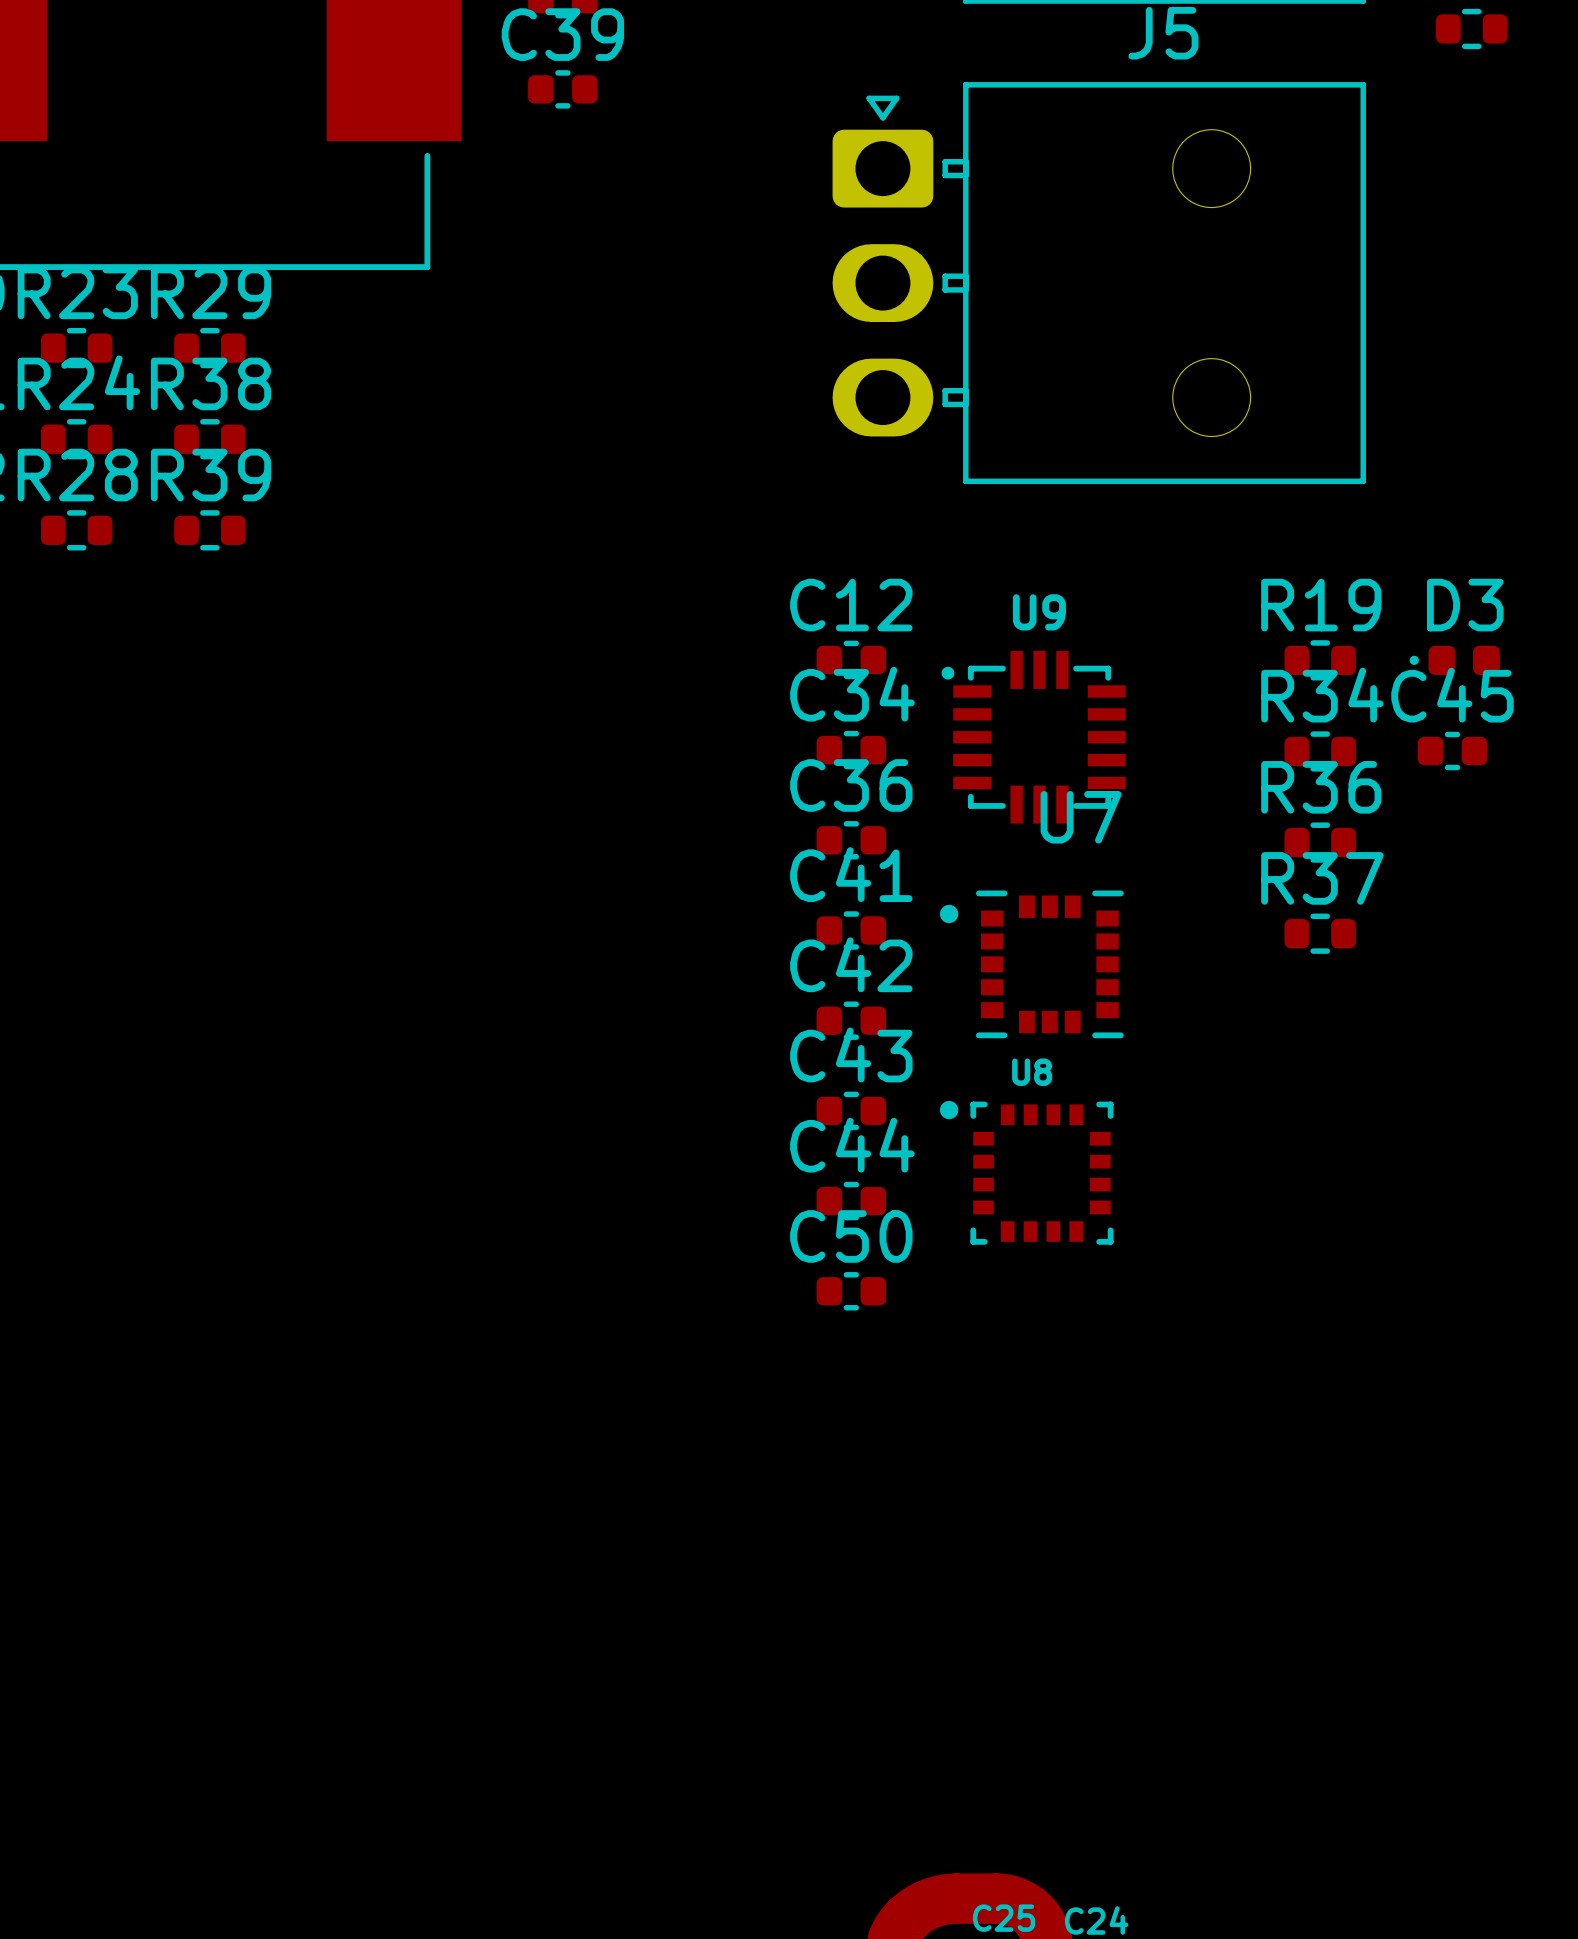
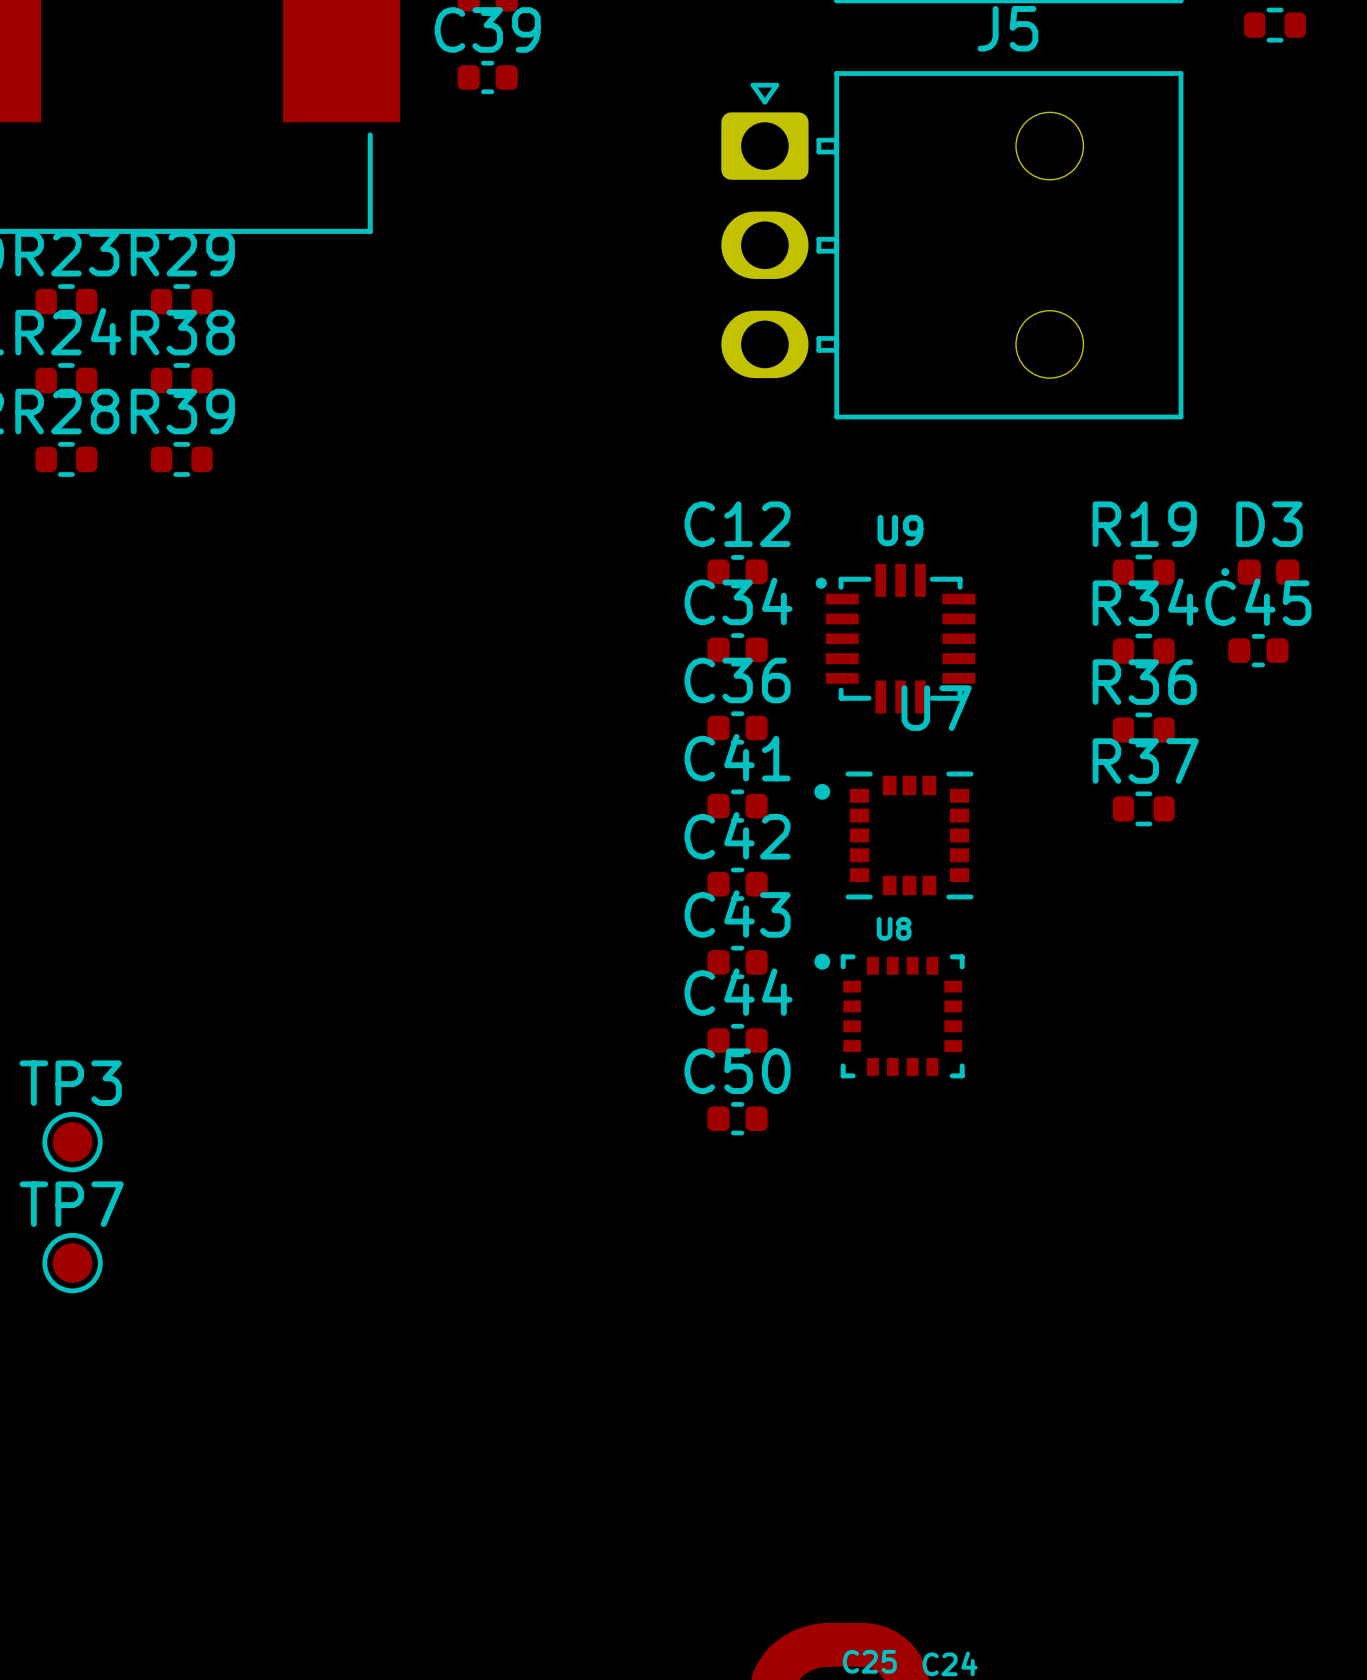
TP3: none -> (72, 1142)
TP7: none -> (72, 1263)

